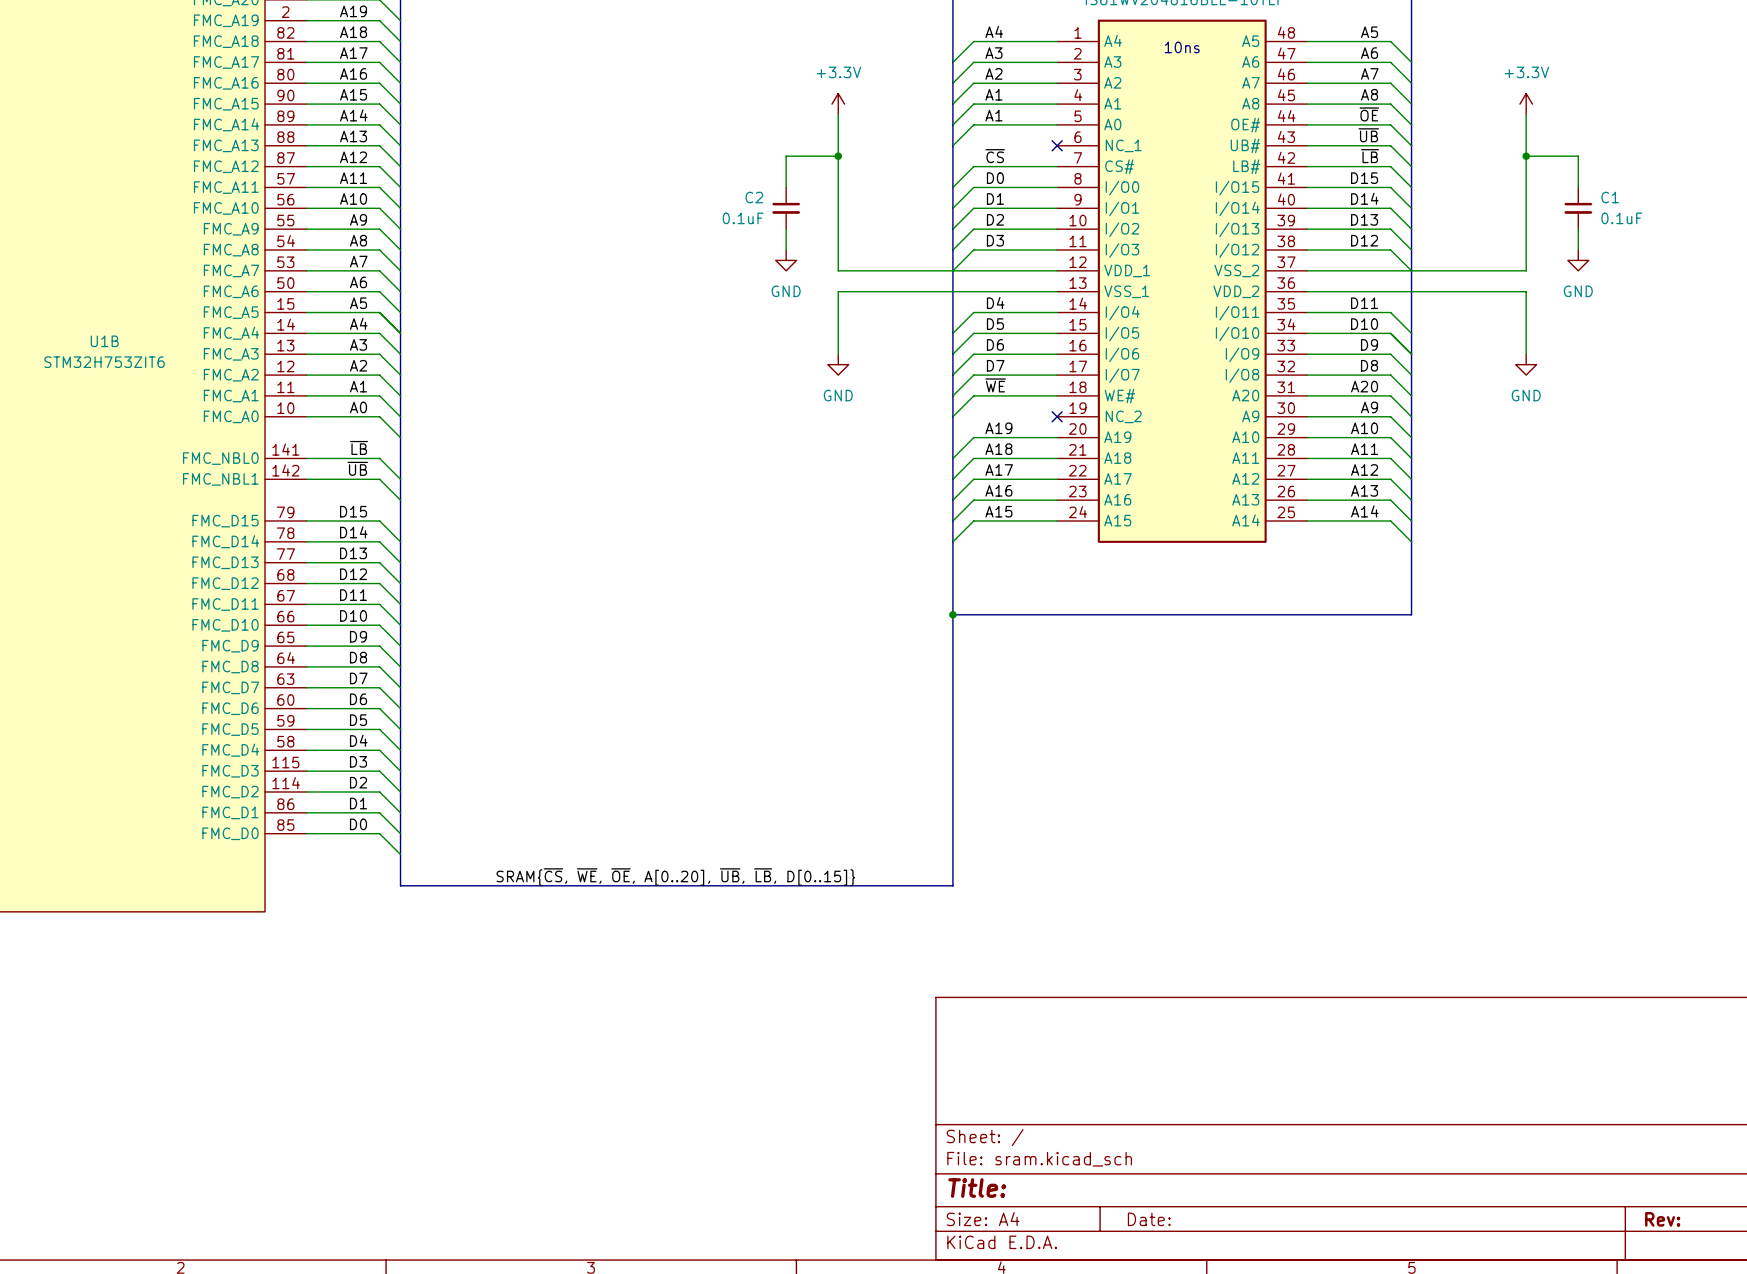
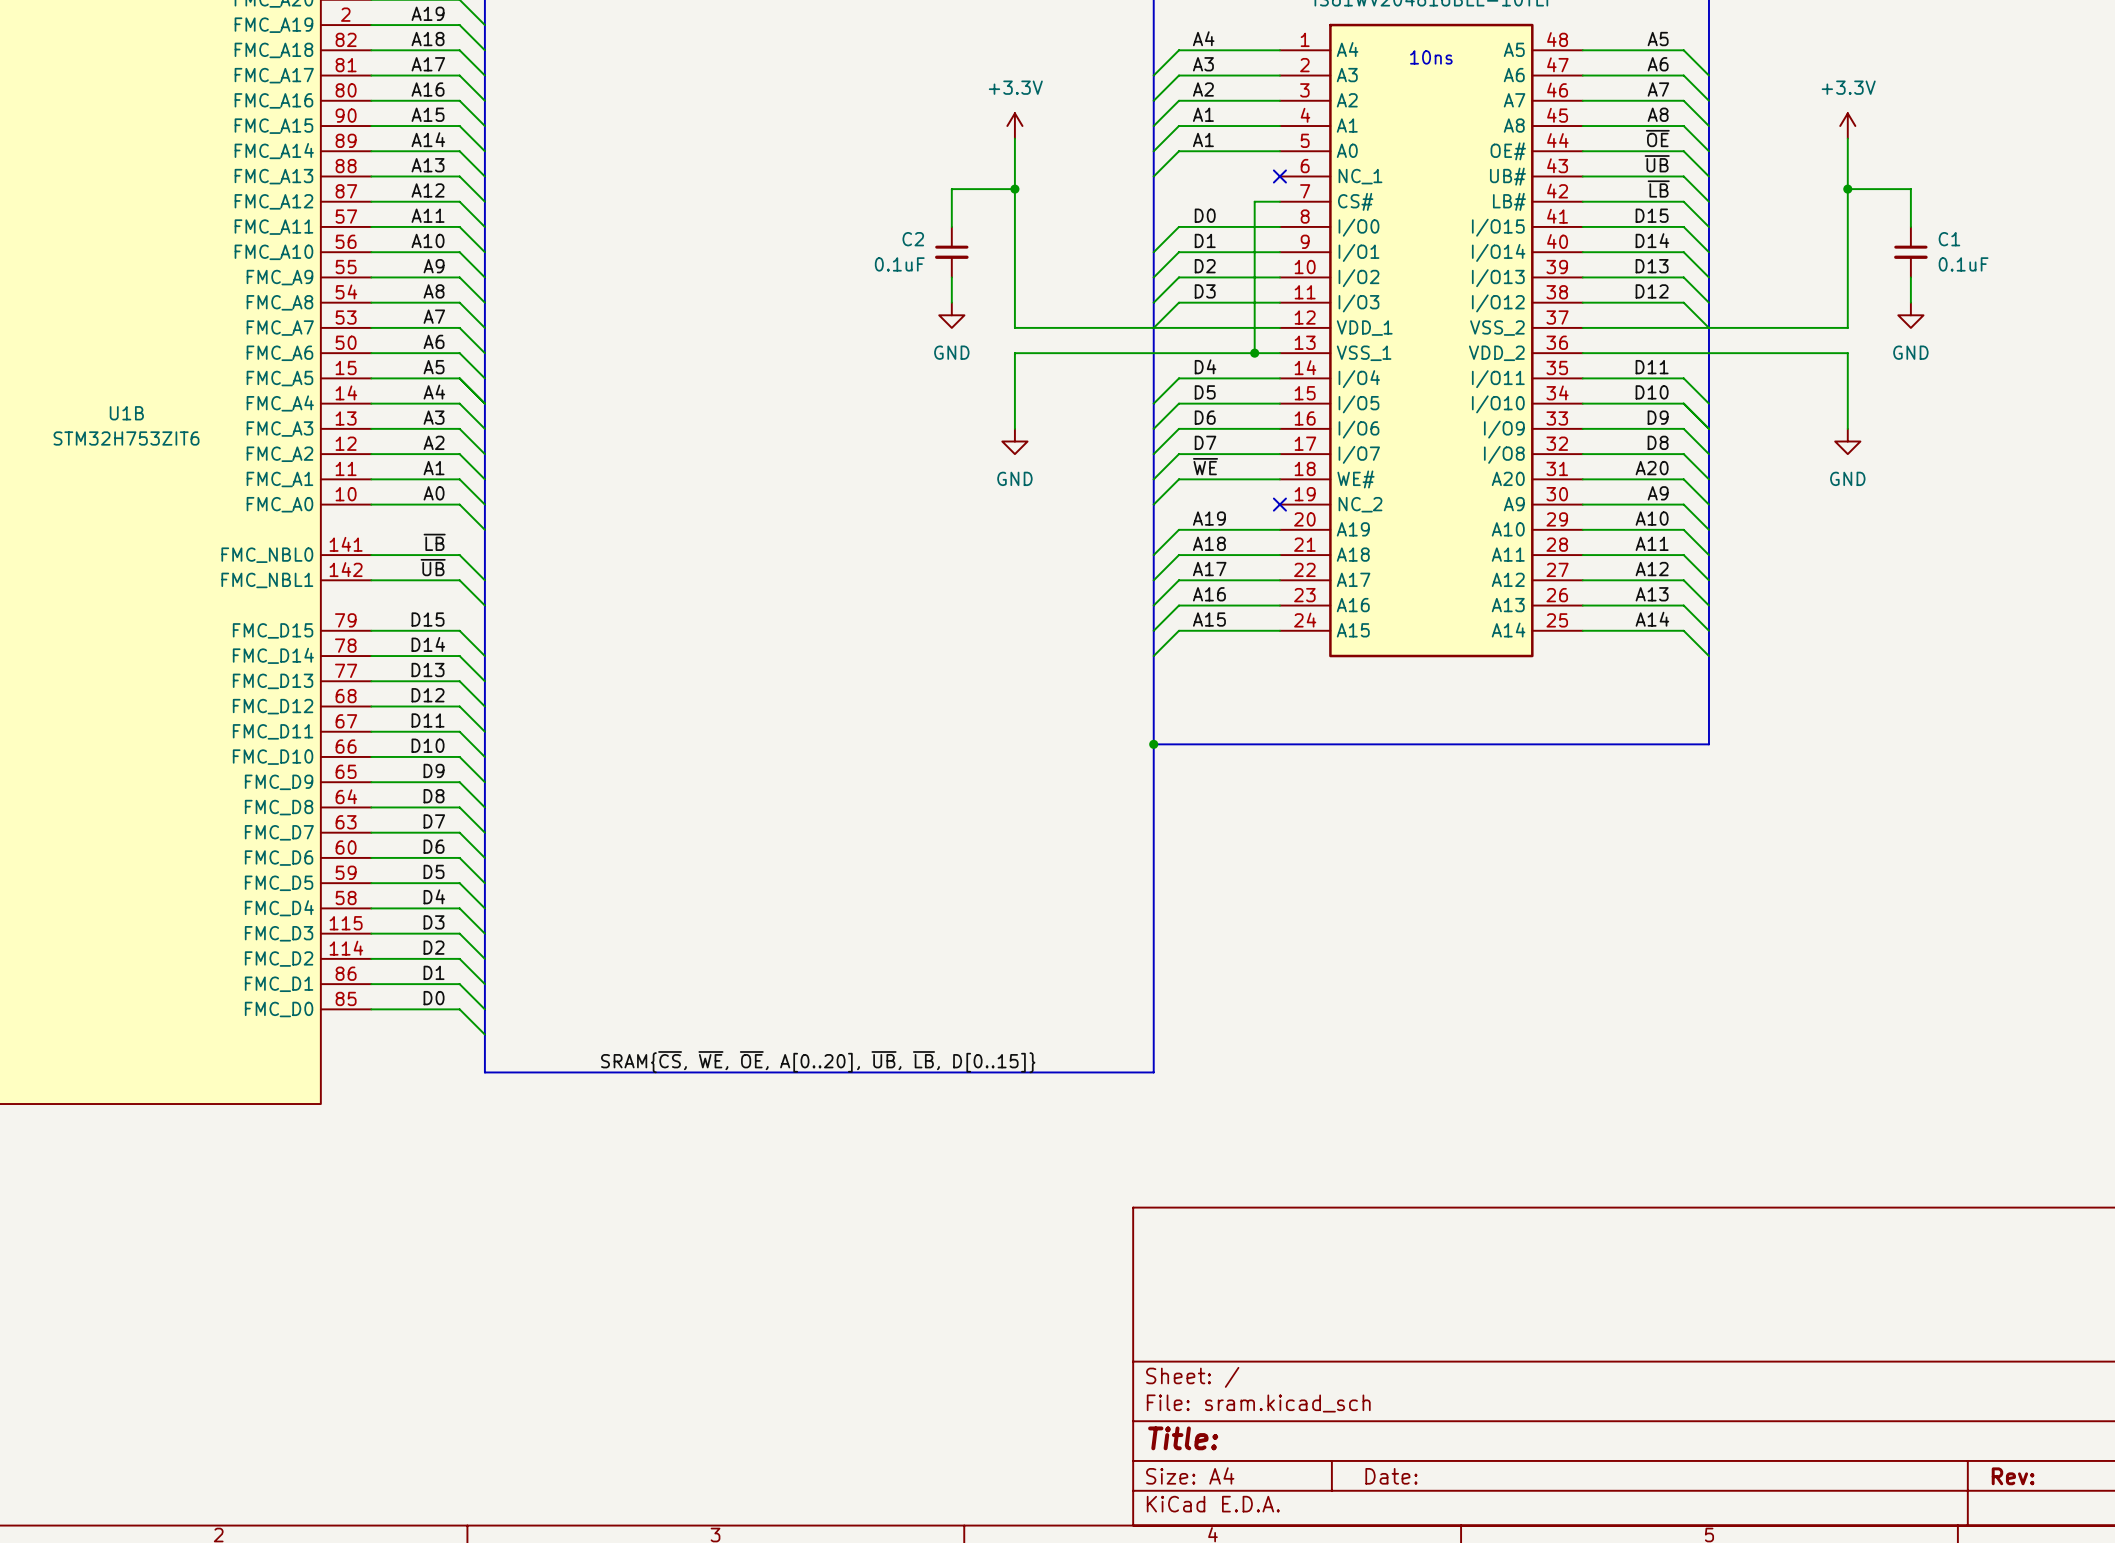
label: ~{CS} (995, 156) -> none
wire: (1036, 166) (973, 166) (952, 187) -> (1254, 201) (1254, 353)
junction: none -> (1254, 353)

